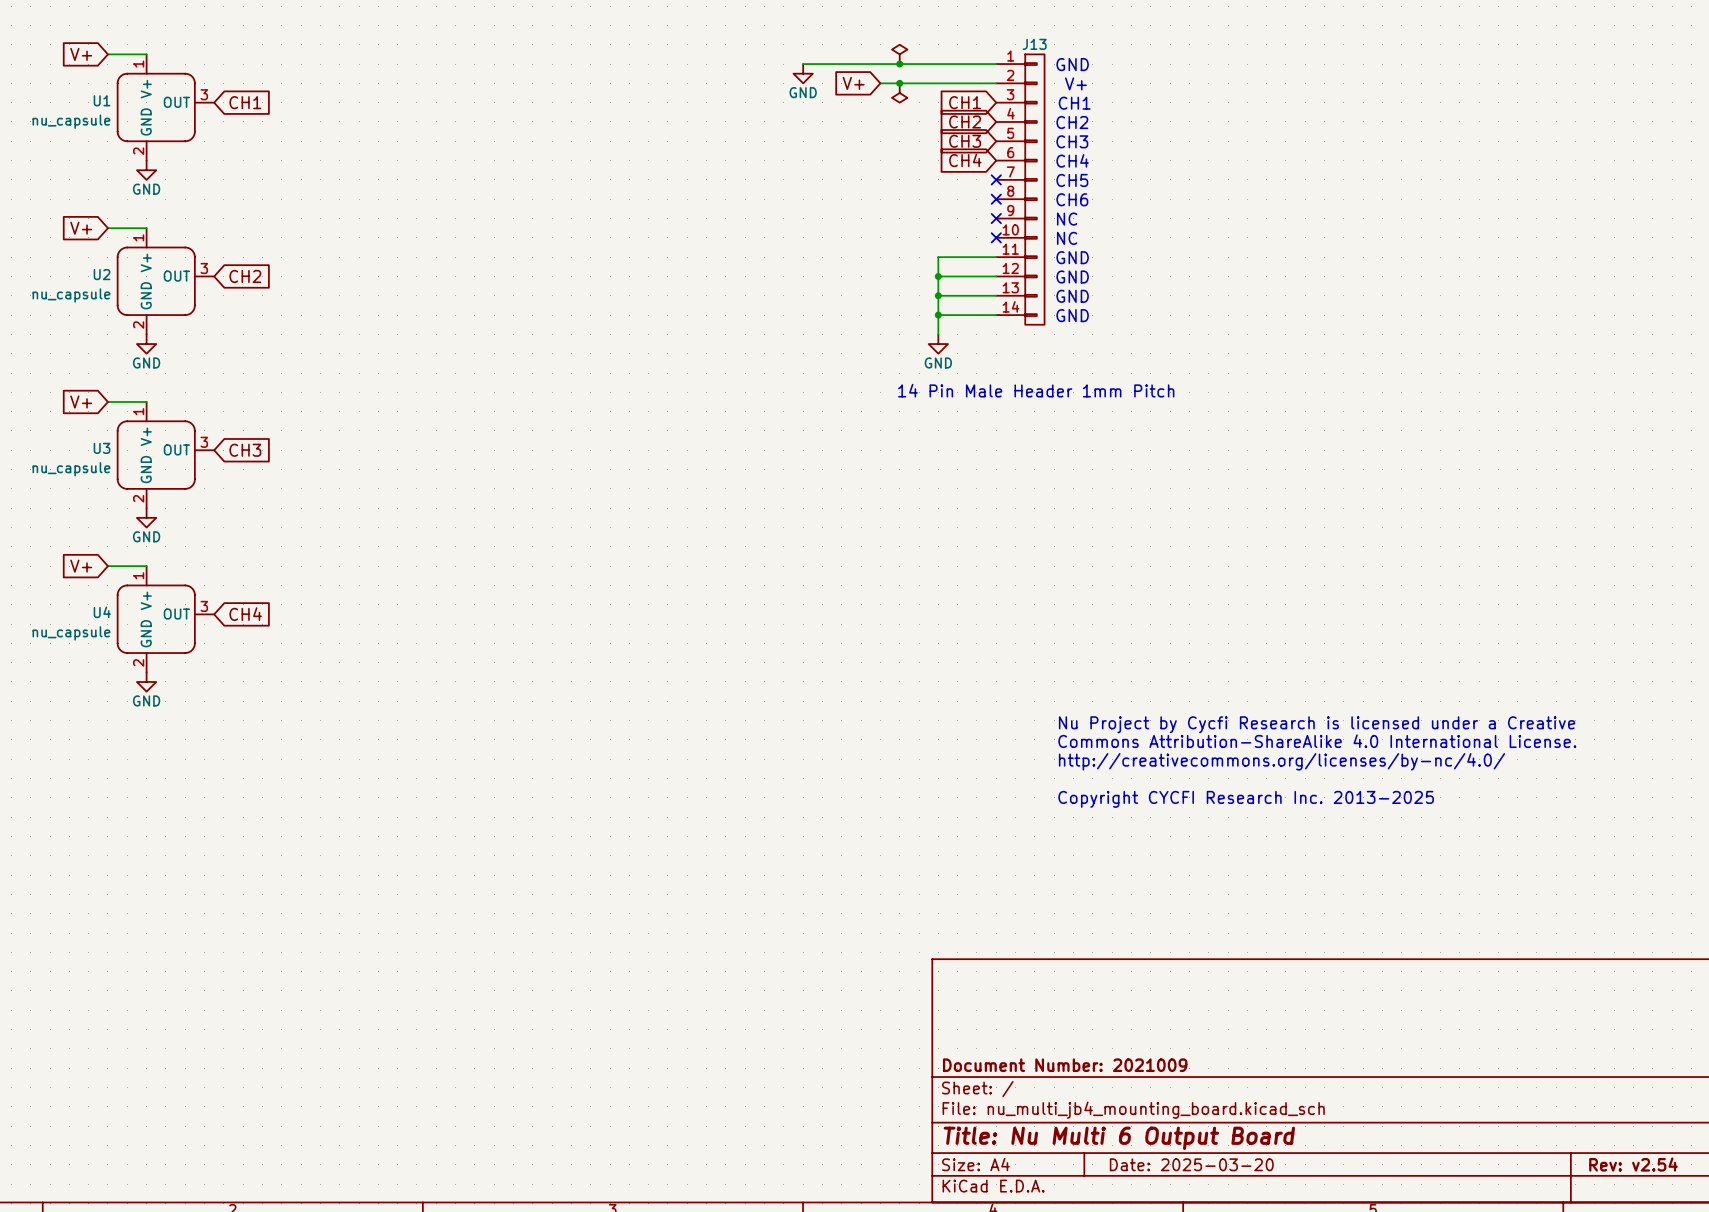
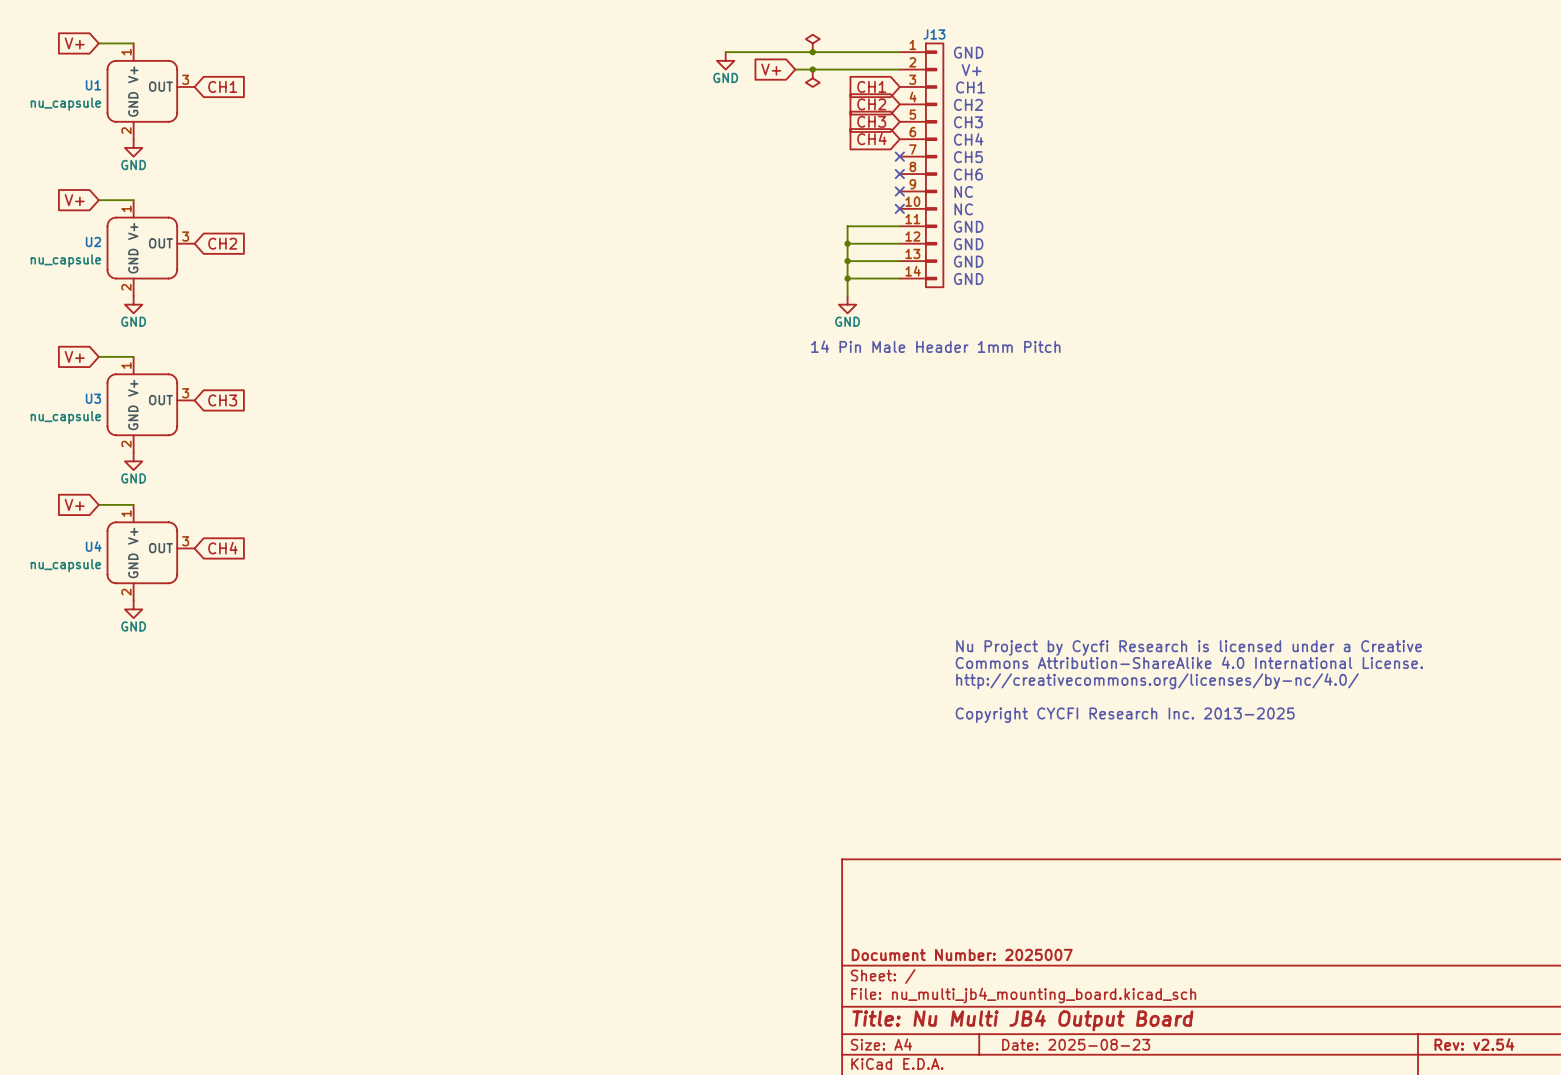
title block: Document Number: 2021009 (1065, 1065) -> Document Number: 2025007 (962, 954)
title block: Title: Nu Multi 6 Output Board (1119, 1138) -> Title: Nu Multi JB4 Output Board (1022, 1020)
title block: Date: 2025-03-20 (1191, 1164) -> Date: 2025-08-23 (1076, 1044)

